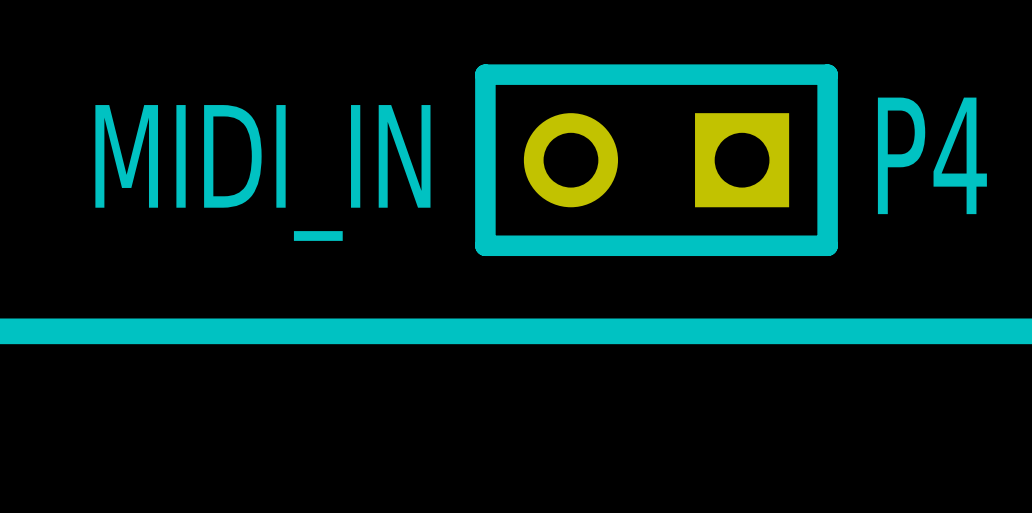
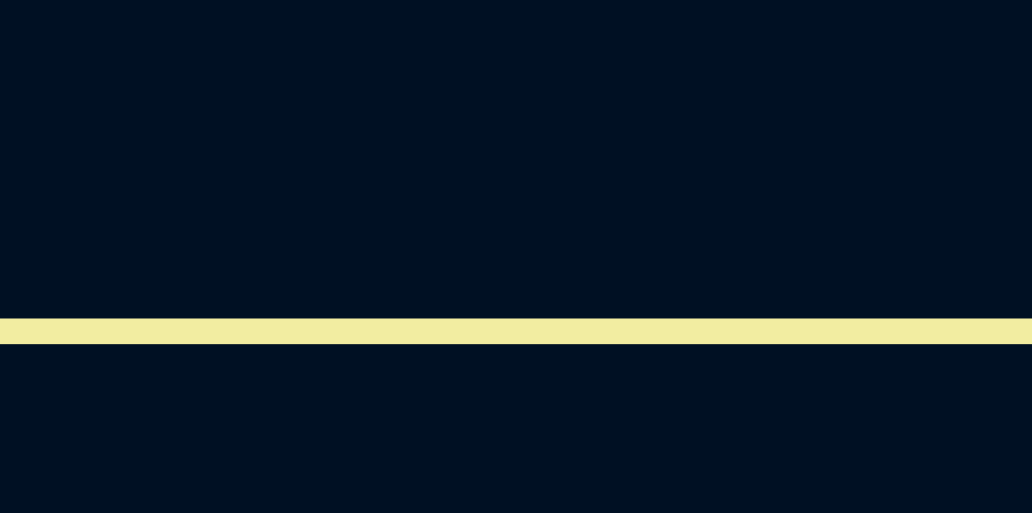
P4: MIDI_IN (656, 160) -> none

